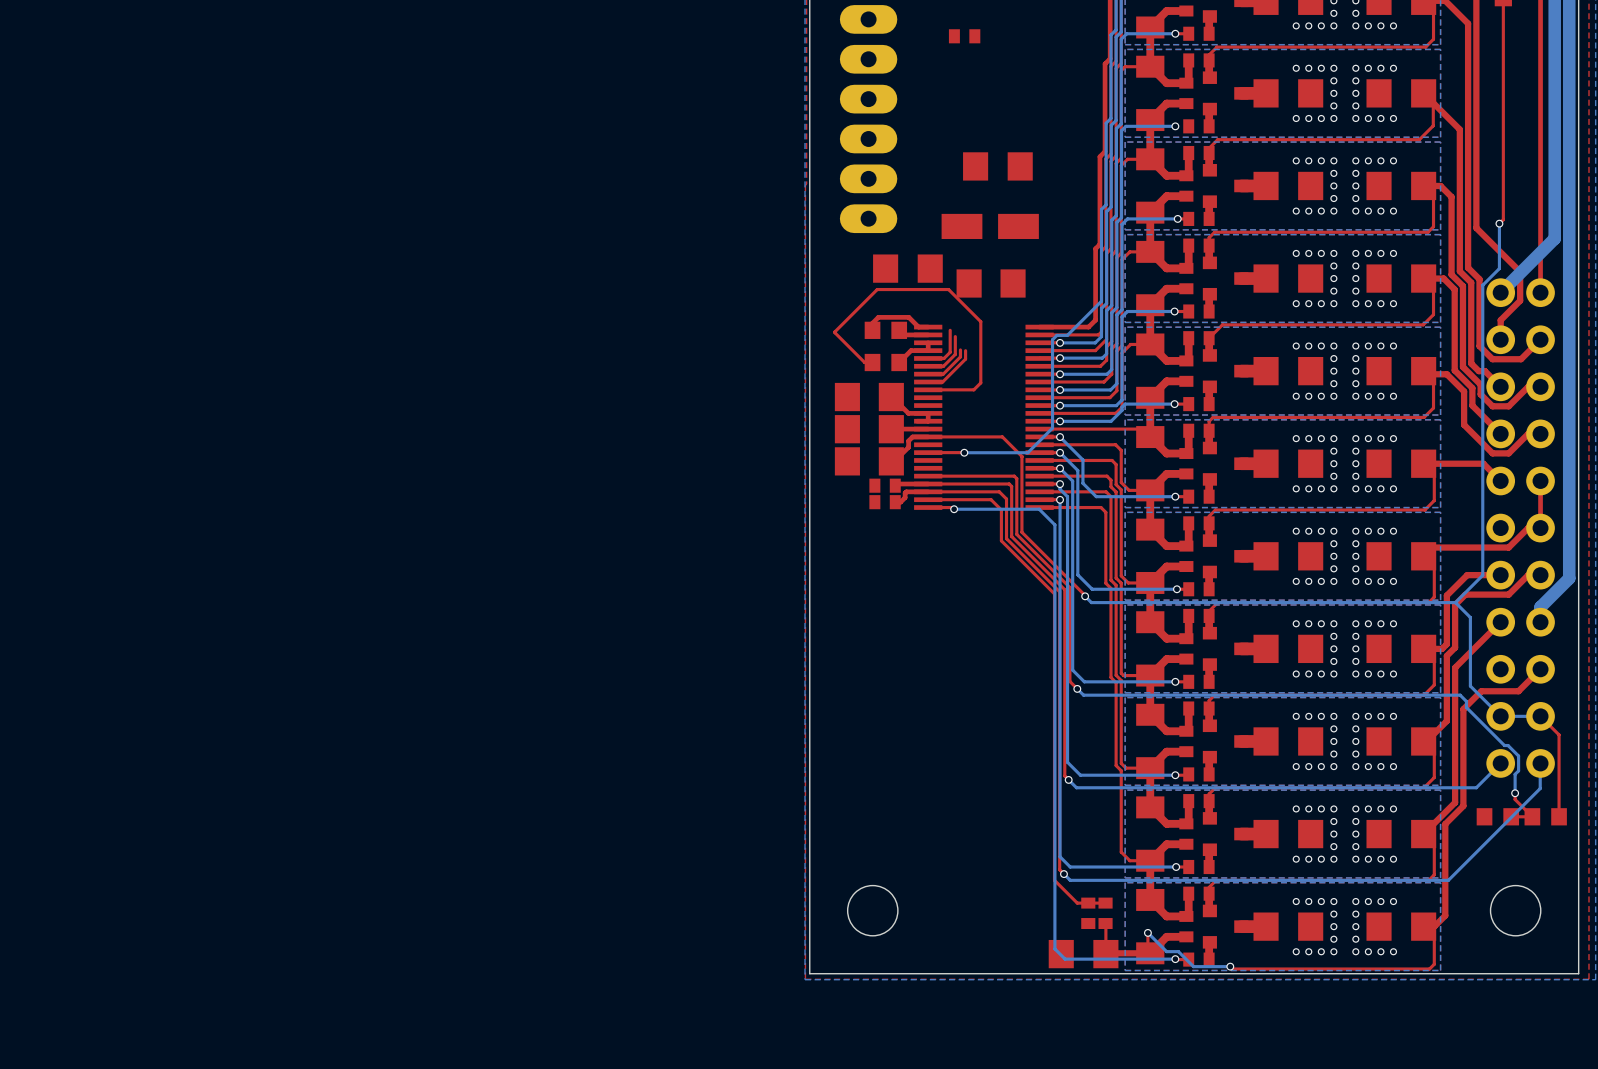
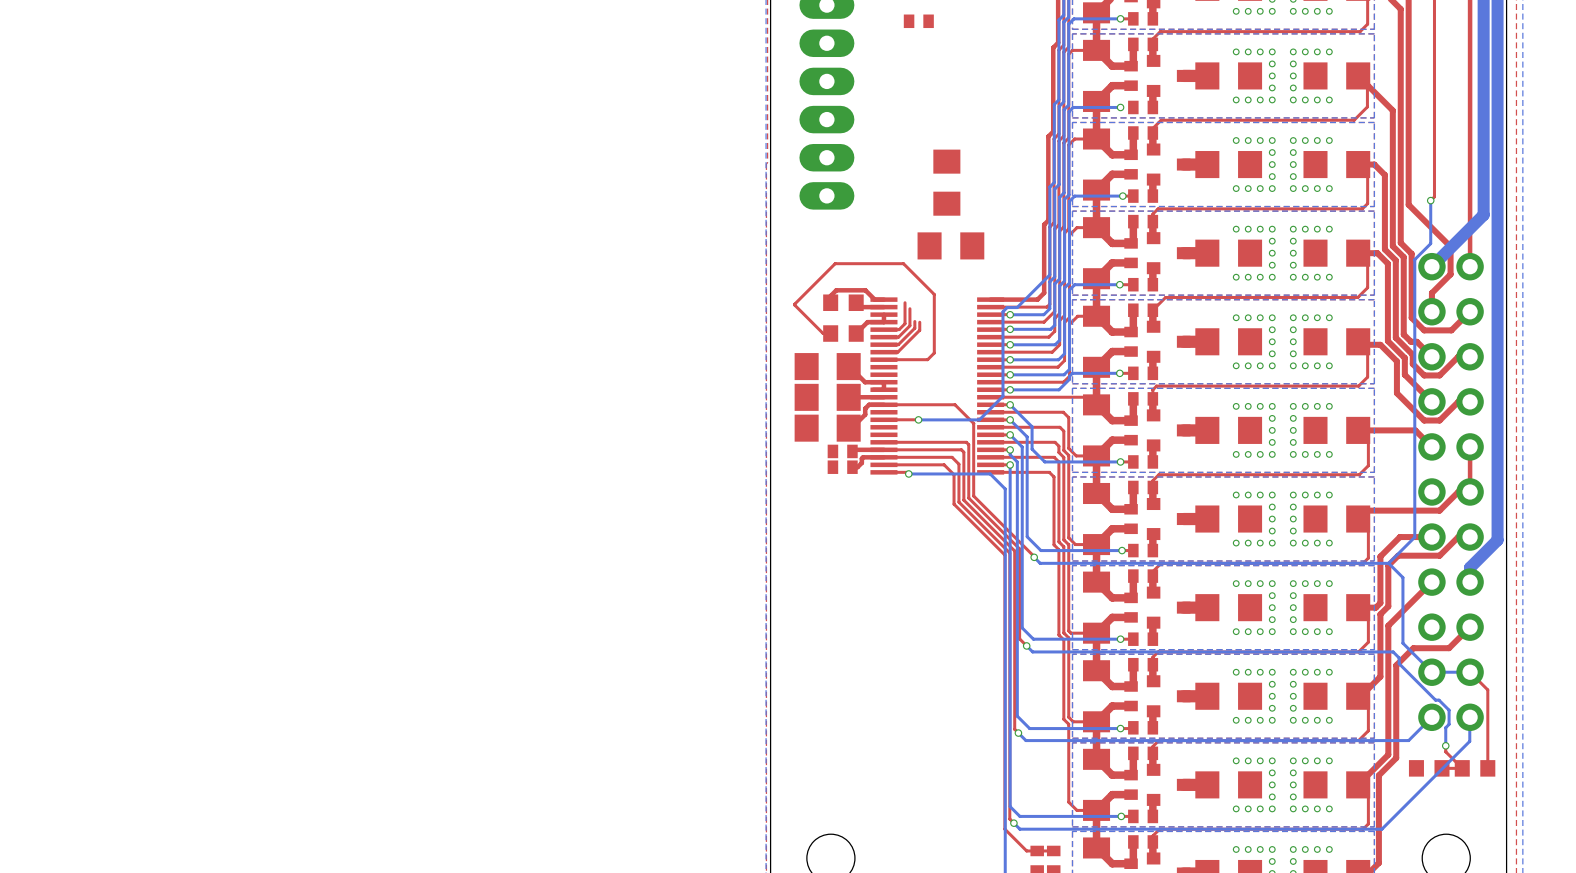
part: (997, 166) -> none
part: none -> (946, 182)
part: (990, 226) -> none
part: (907, 268) -> none
part footprint: [956, 269, 1026, 298] -> [917, 232, 985, 260]

